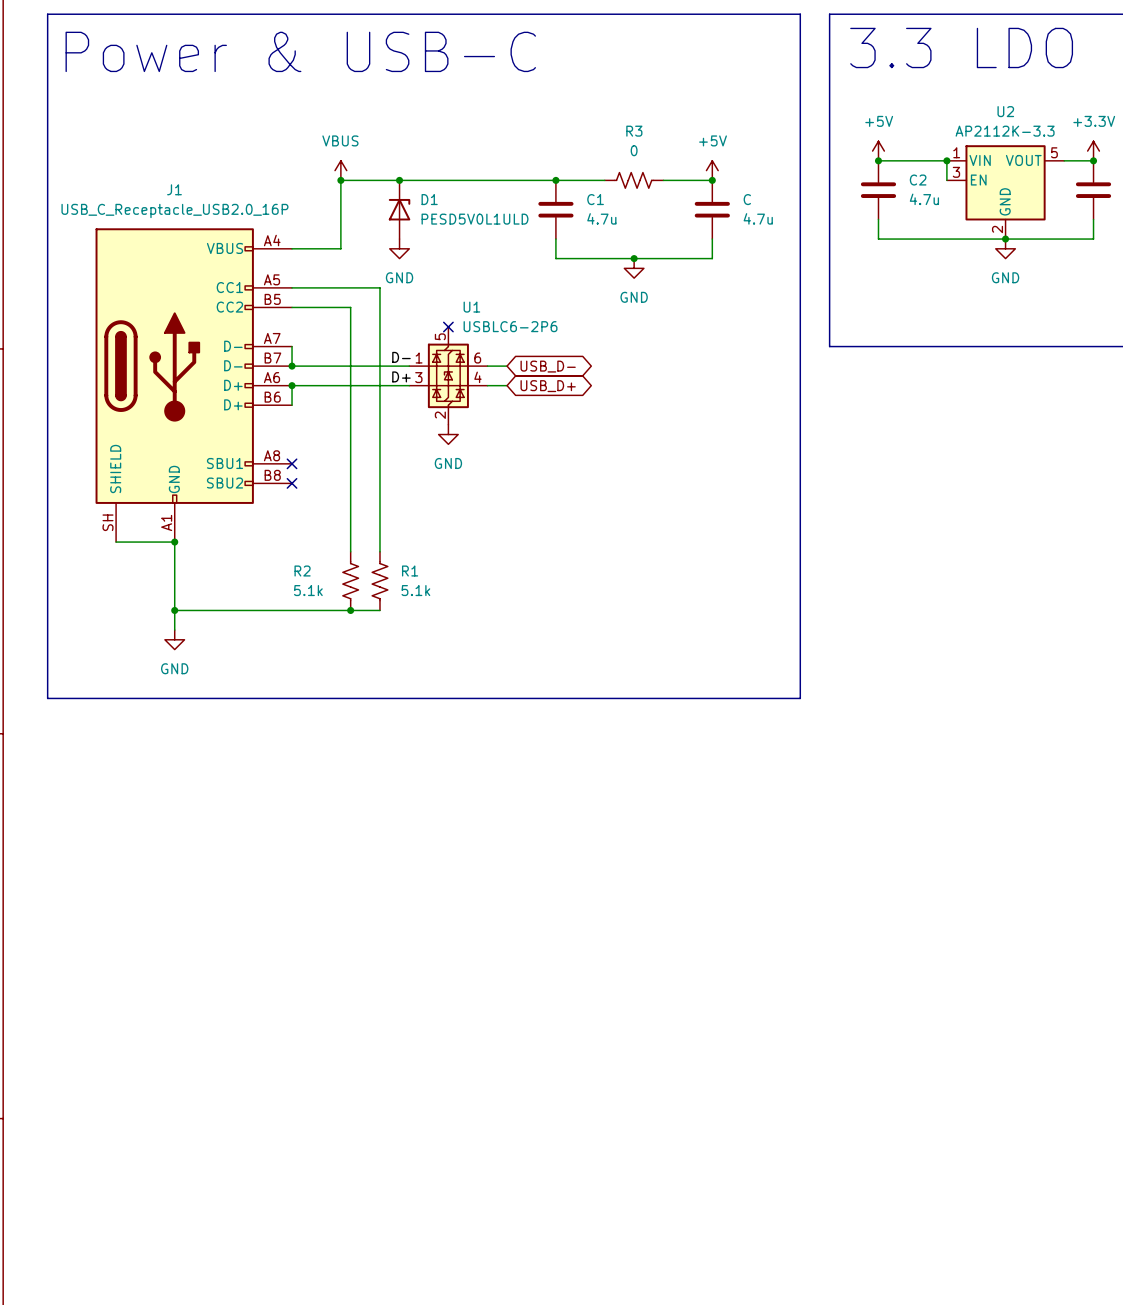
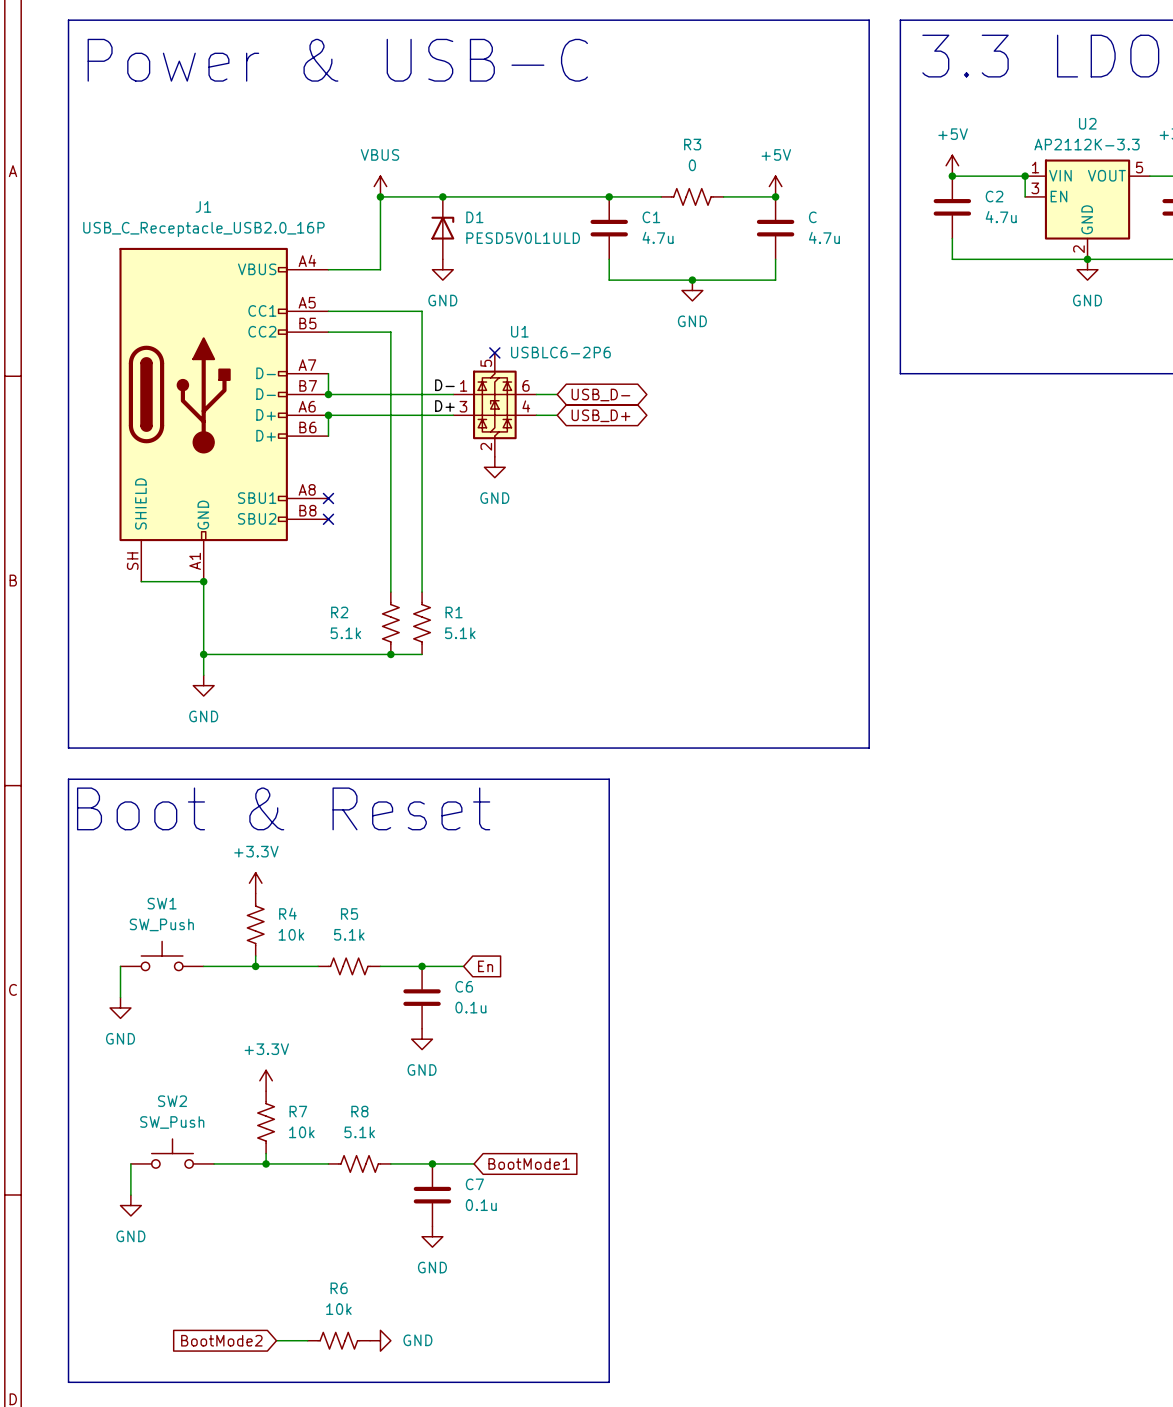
line: none -> (68, 779) (609, 779) (609, 1382) (68, 1382) (68, 779)
text: none -> Boot & Reset (283, 808)
power symbol: none -> +3.3V (255, 883)
R4: none -> 10k (255, 924)
SW1: none -> SW_Push (162, 956)
wire: none -> (255, 956) (255, 966)
wire: none -> (120, 966) (120, 997)
wire: none -> (203, 966) (318, 966)
junction: none -> (255, 966)
R5: none -> 5.1k (349, 966)
wire: none -> (380, 966) (463, 966)
junction: none -> (422, 966)
global label: none -> En (485, 966)
C6: none -> 0.1u (422, 997)
power symbol: none -> GND (120, 1007)
power symbol: none -> GND (422, 1039)
power symbol: none -> +3.3V (266, 1080)
R7: none -> 10k (266, 1122)
SW2: none -> SW_Push (172, 1153)
wire: none -> (266, 1153) (266, 1163)
wire: none -> (130, 1163) (130, 1195)
wire: none -> (214, 1163) (328, 1163)
junction: none -> (266, 1163)
R8: none -> 5.1k (359, 1163)
wire: none -> (390, 1163) (474, 1163)
junction: none -> (432, 1163)
global label: none -> BootMode1 (529, 1163)
C7: none -> 0.1u (432, 1195)
power symbol: none -> GND (130, 1205)
power symbol: none -> GND (432, 1236)
global label: none -> BootMode2 (221, 1340)
wire: none -> (276, 1340) (307, 1340)
R6: none -> 10k (338, 1340)
power symbol: none -> GND (380, 1340)

